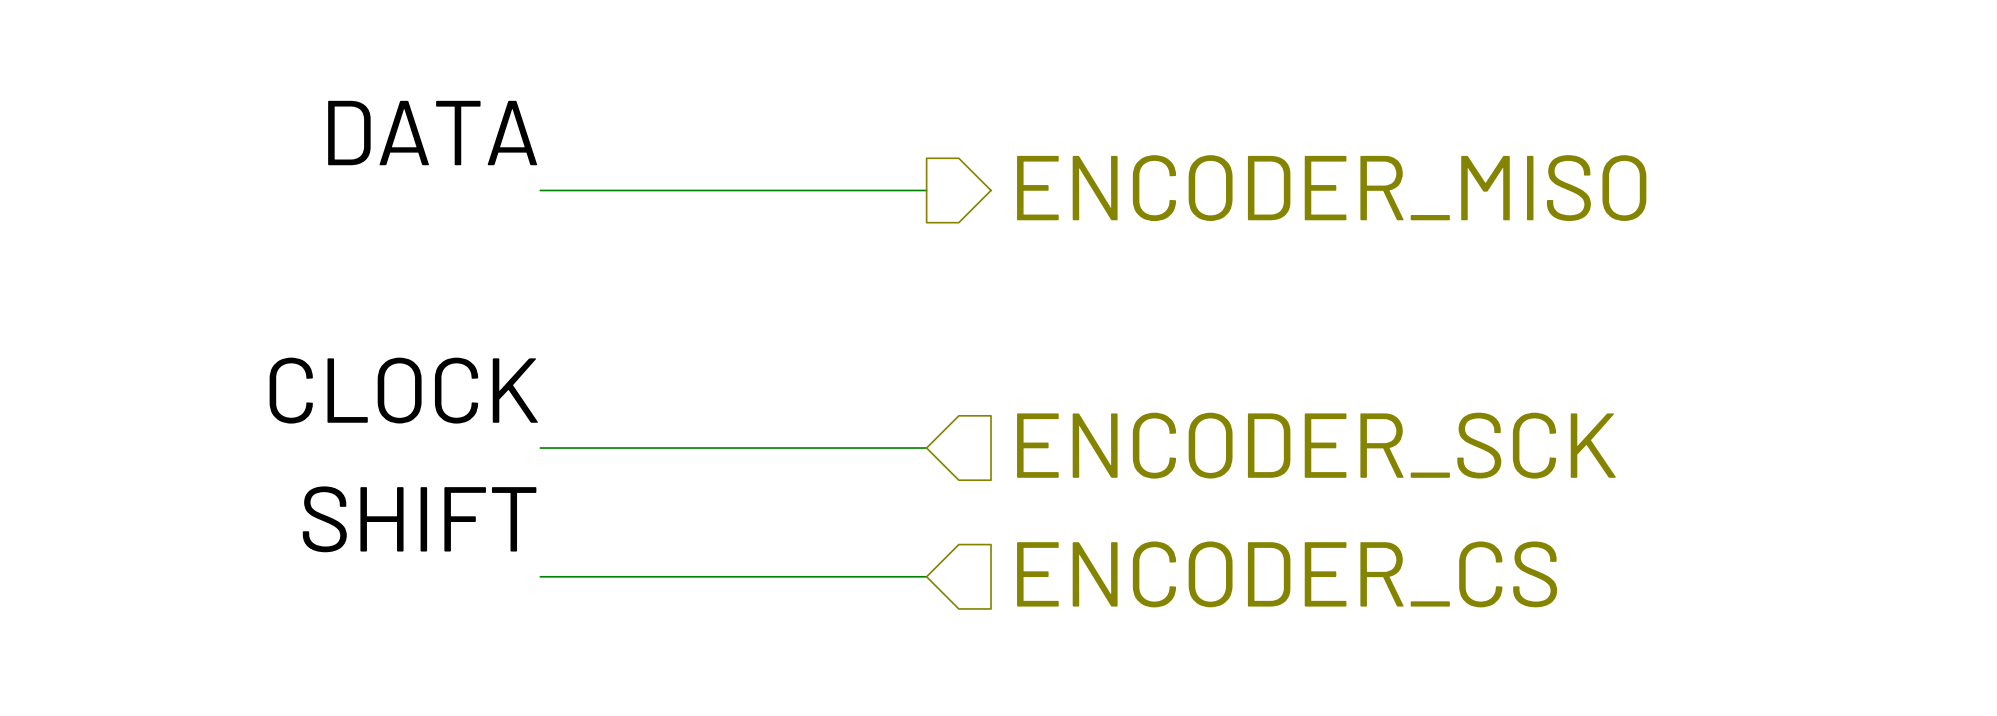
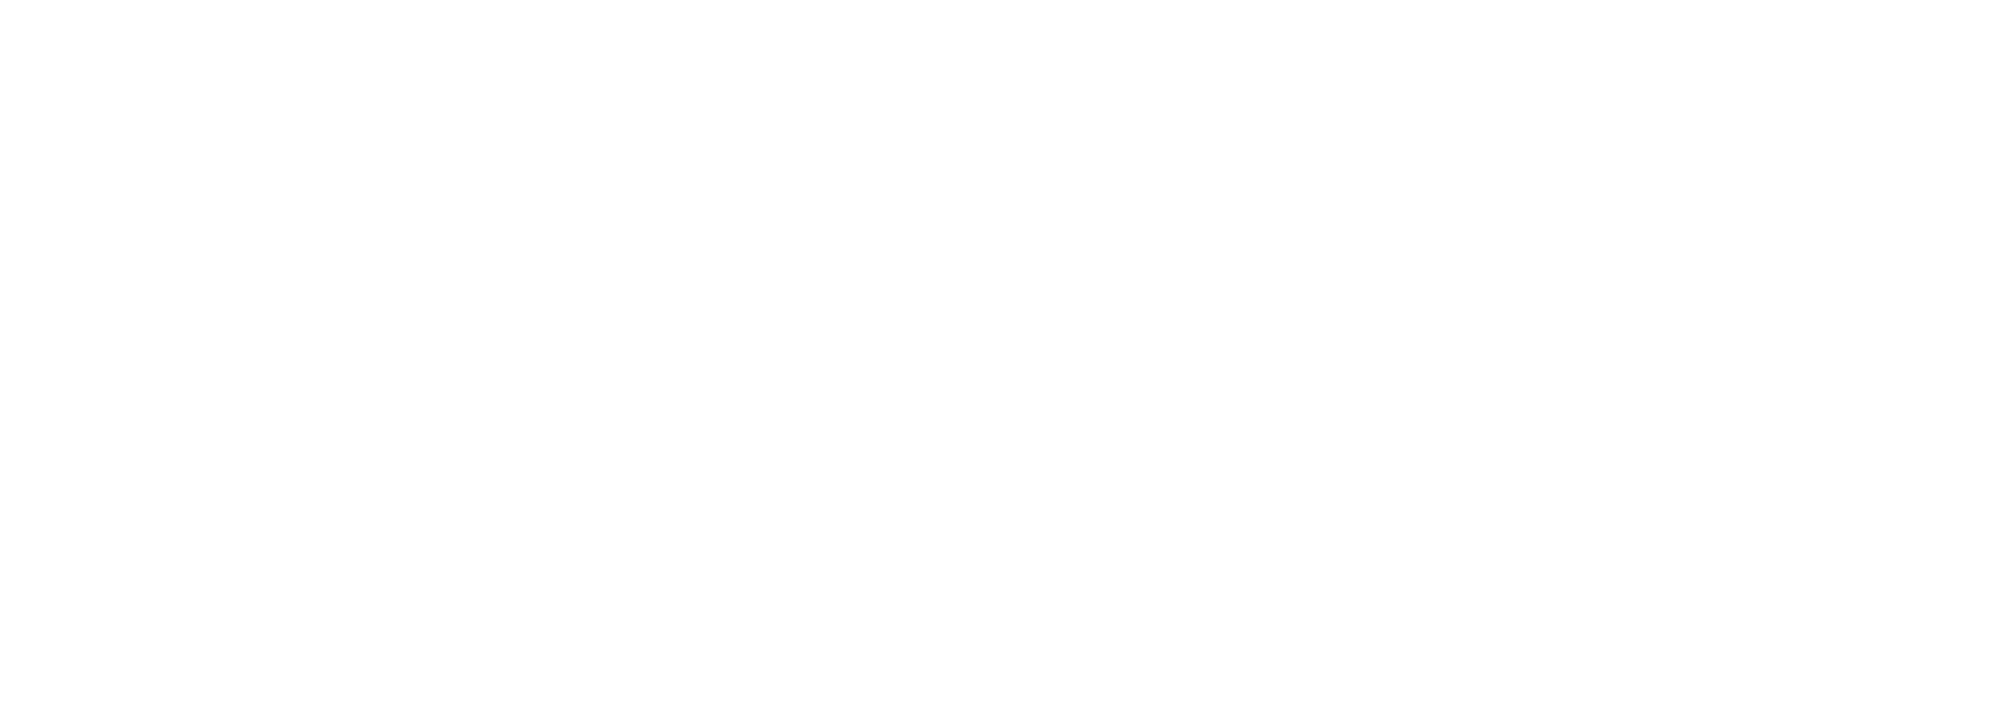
label: DATA (432, 133) -> none
hierarchical label: ENCODER_MISO (1331, 188) -> none
wire: (540, 190) (926, 190) -> none
label: CLOCK (403, 390) -> none
hierarchical label: ENCODER_SCK (1316, 445) -> none
wire: (540, 448) (926, 448) -> none
label: SHIFT (419, 519) -> none
hierarchical label: ENCODER_CS (1287, 574) -> none
wire: (540, 576) (926, 576) -> none

